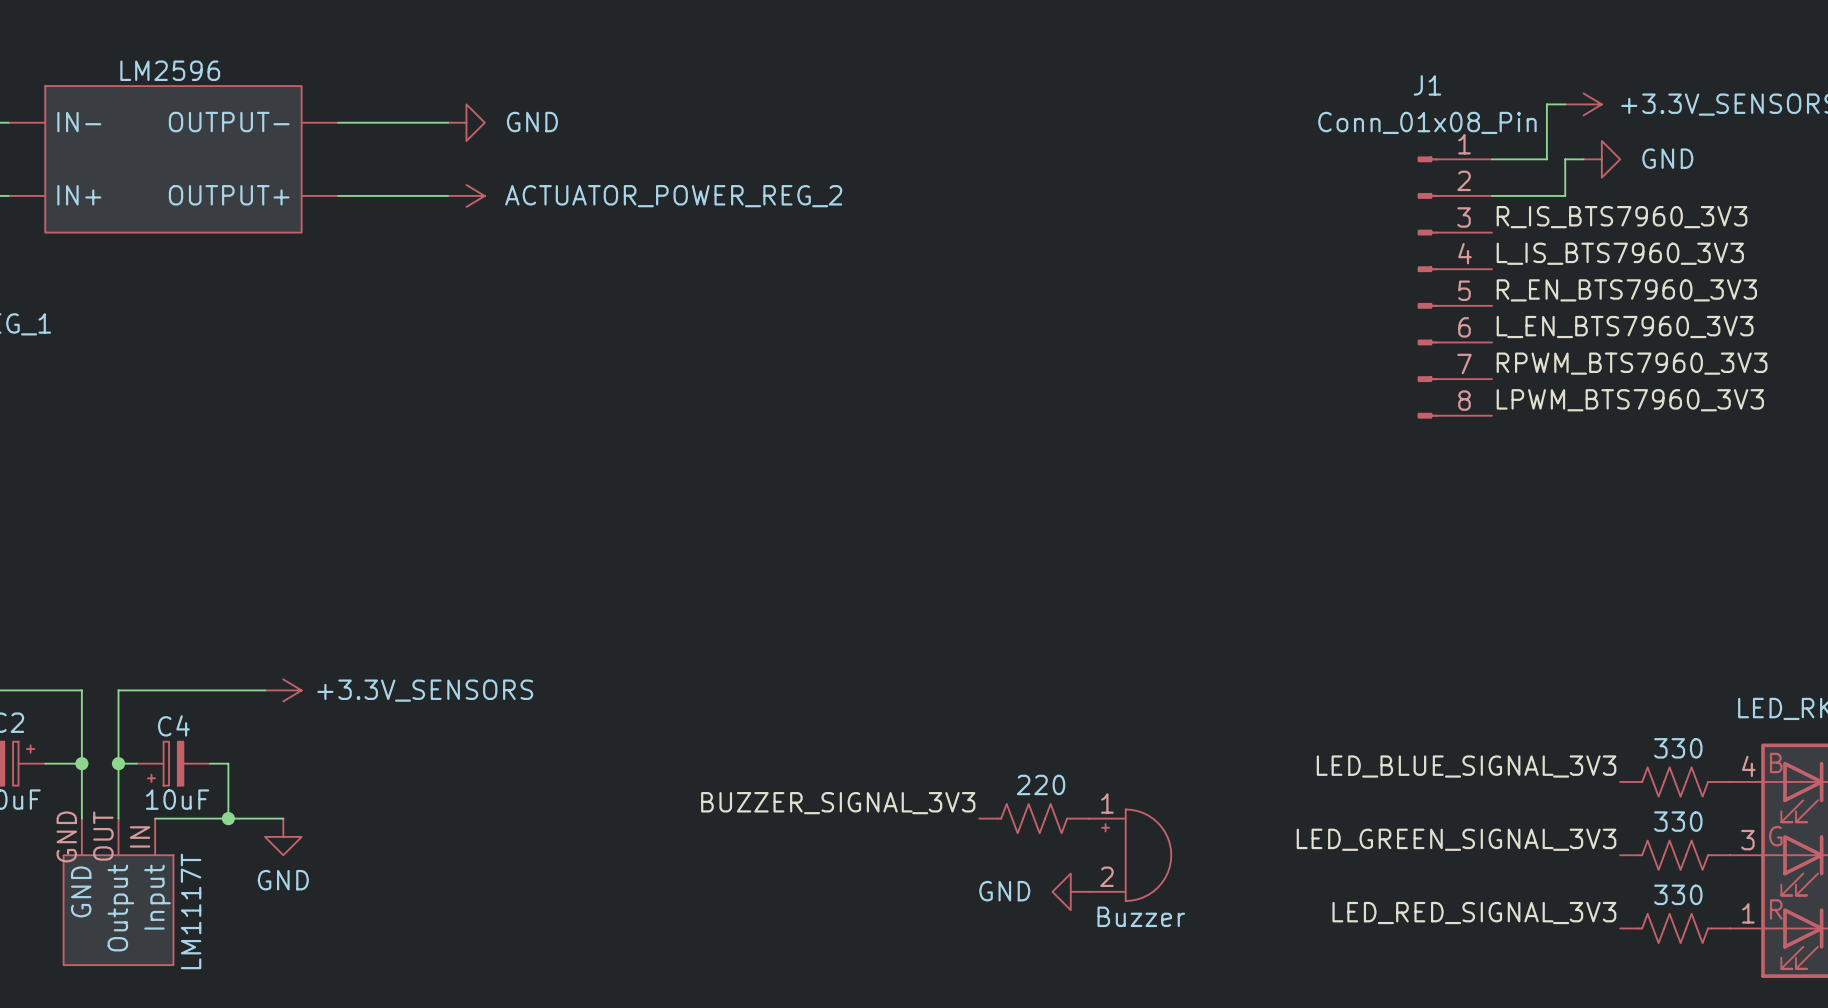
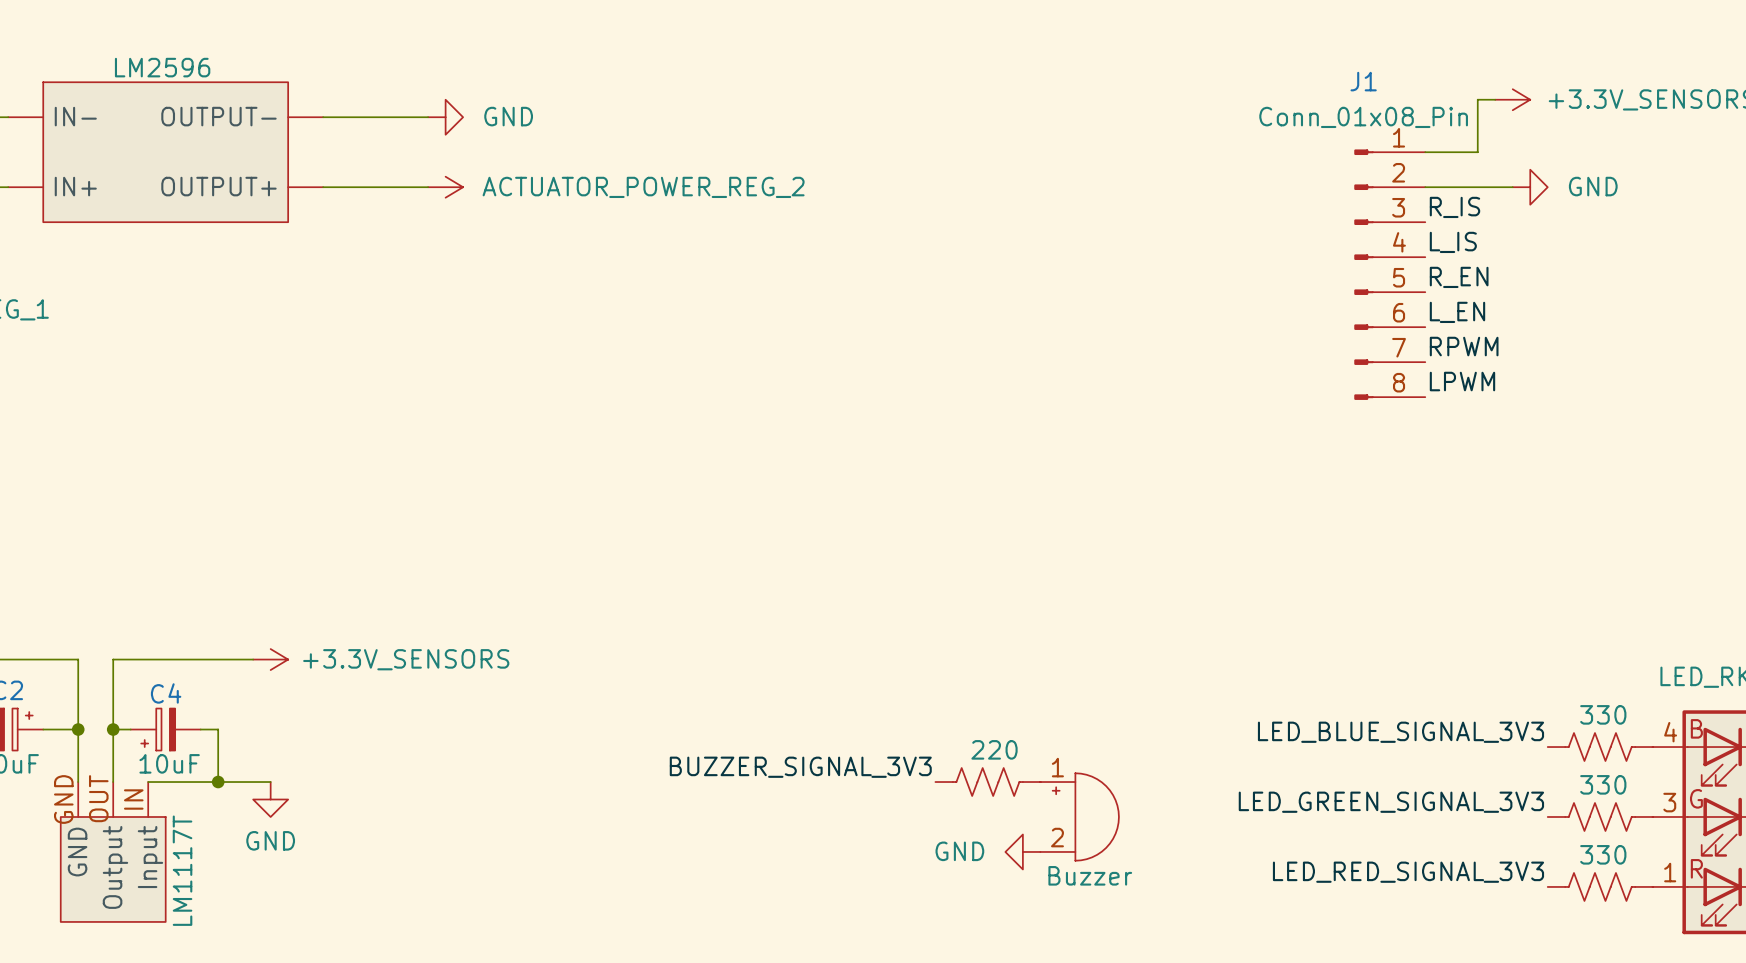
wire: (1583, 159) (1565, 159) (1565, 195) -> (1512, 187) (1495, 187)
power symbol position: GND (1601, 159) -> GND (1530, 187)
label: R_IS_BTS7960_3V3 (1622, 217) -> R_IS (1454, 207)
label: L_IS_BTS7960_3V3 (1620, 253) -> L_IS (1453, 242)
label: R_EN_BTS7960_3V3 (1626, 290) -> R_EN (1459, 277)
label: L_EN_BTS7960_3V3 (1625, 327) -> L_EN (1457, 312)
label: RPWM_BTS7960_3V3 (1632, 363) -> RPWM (1464, 346)
label: LPWM_BTS7960_3V3 (1630, 400) -> LPWM (1462, 381)

